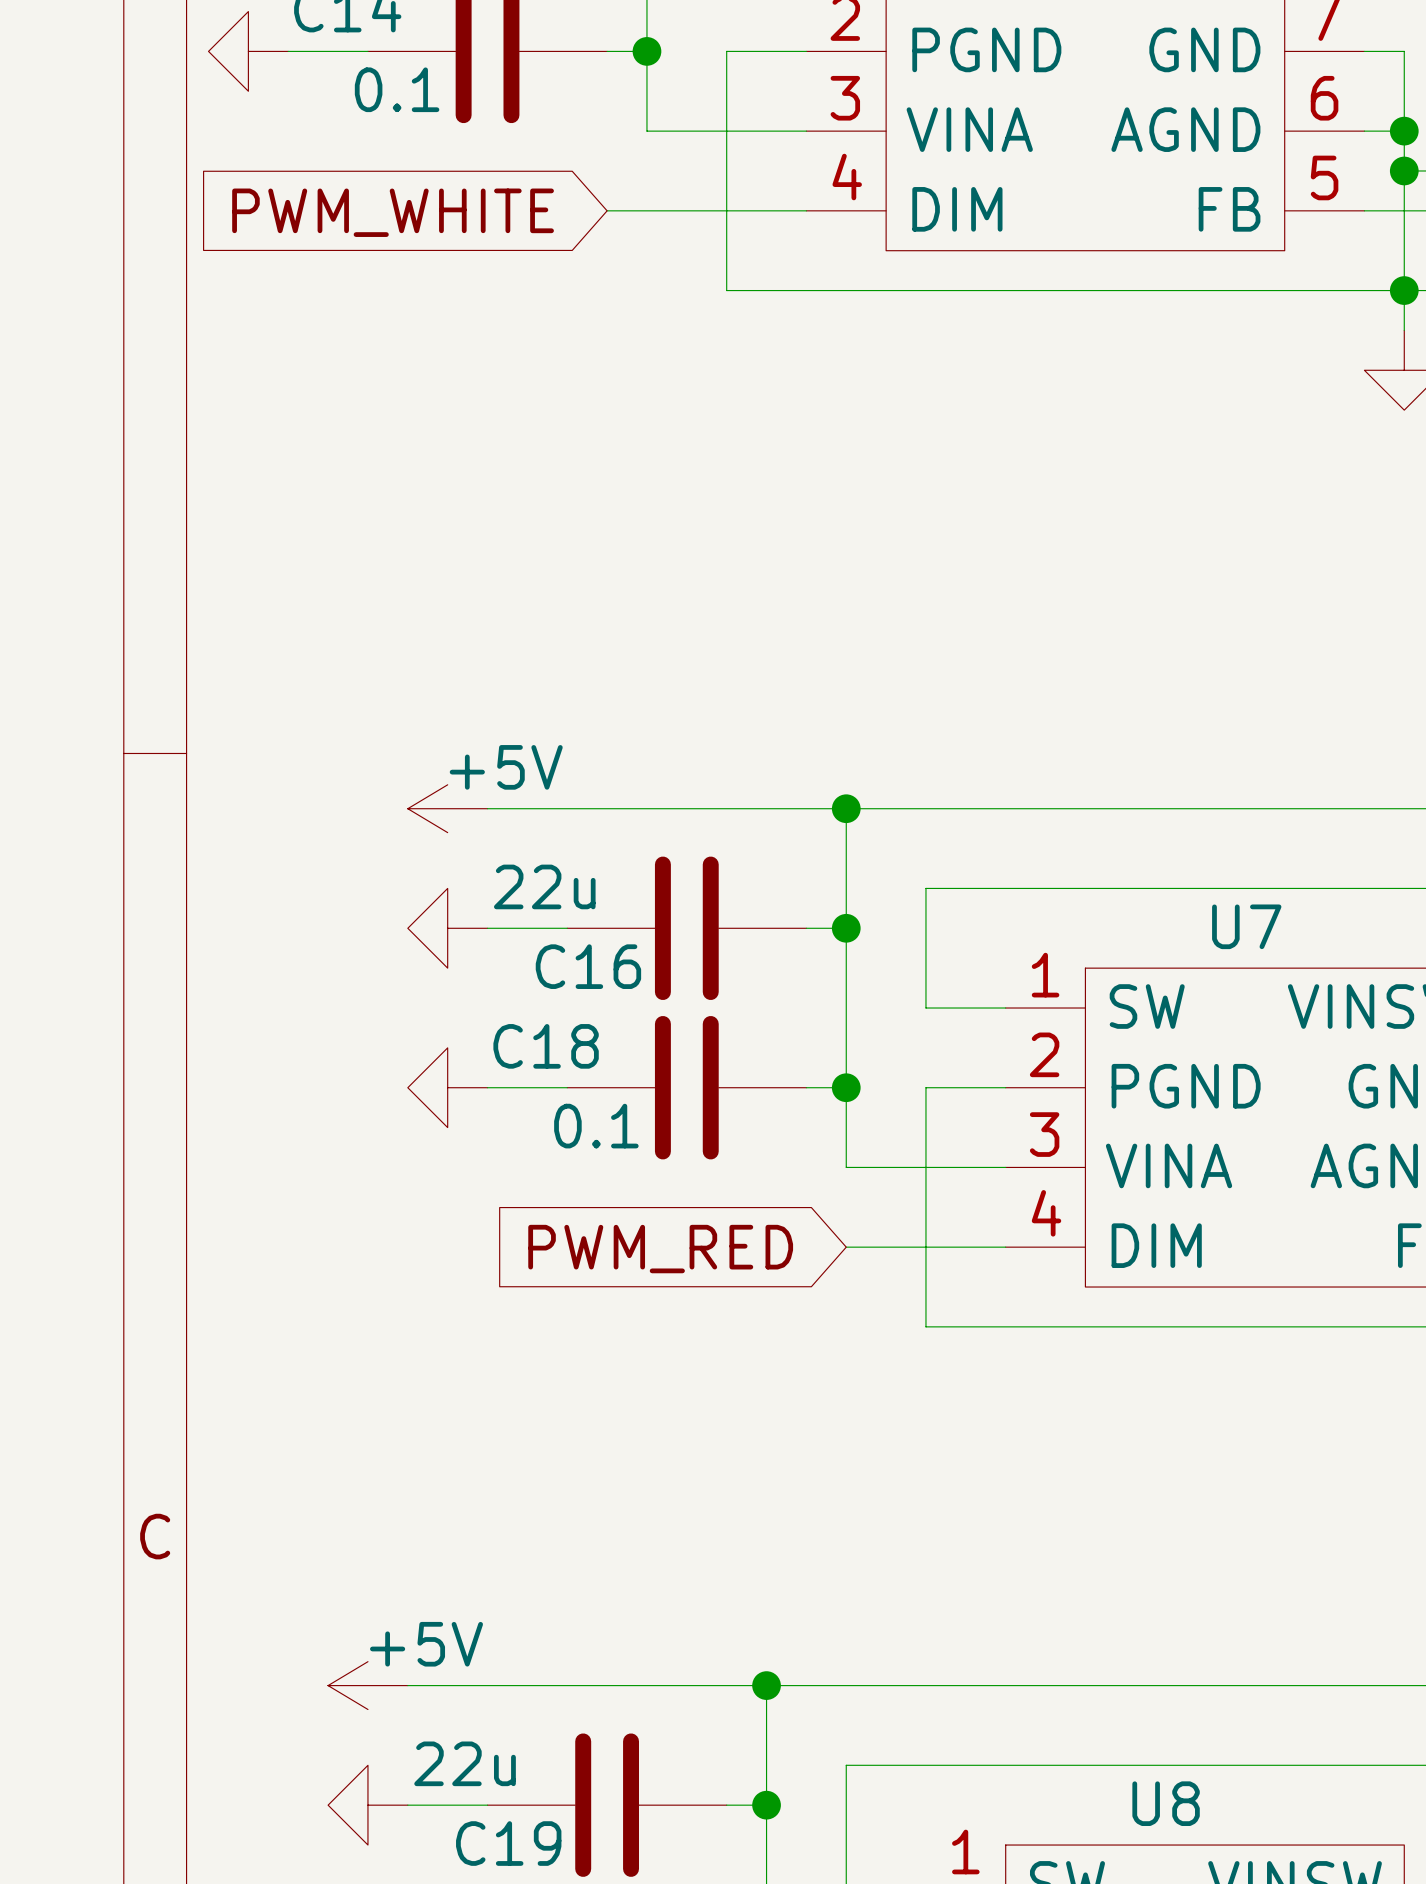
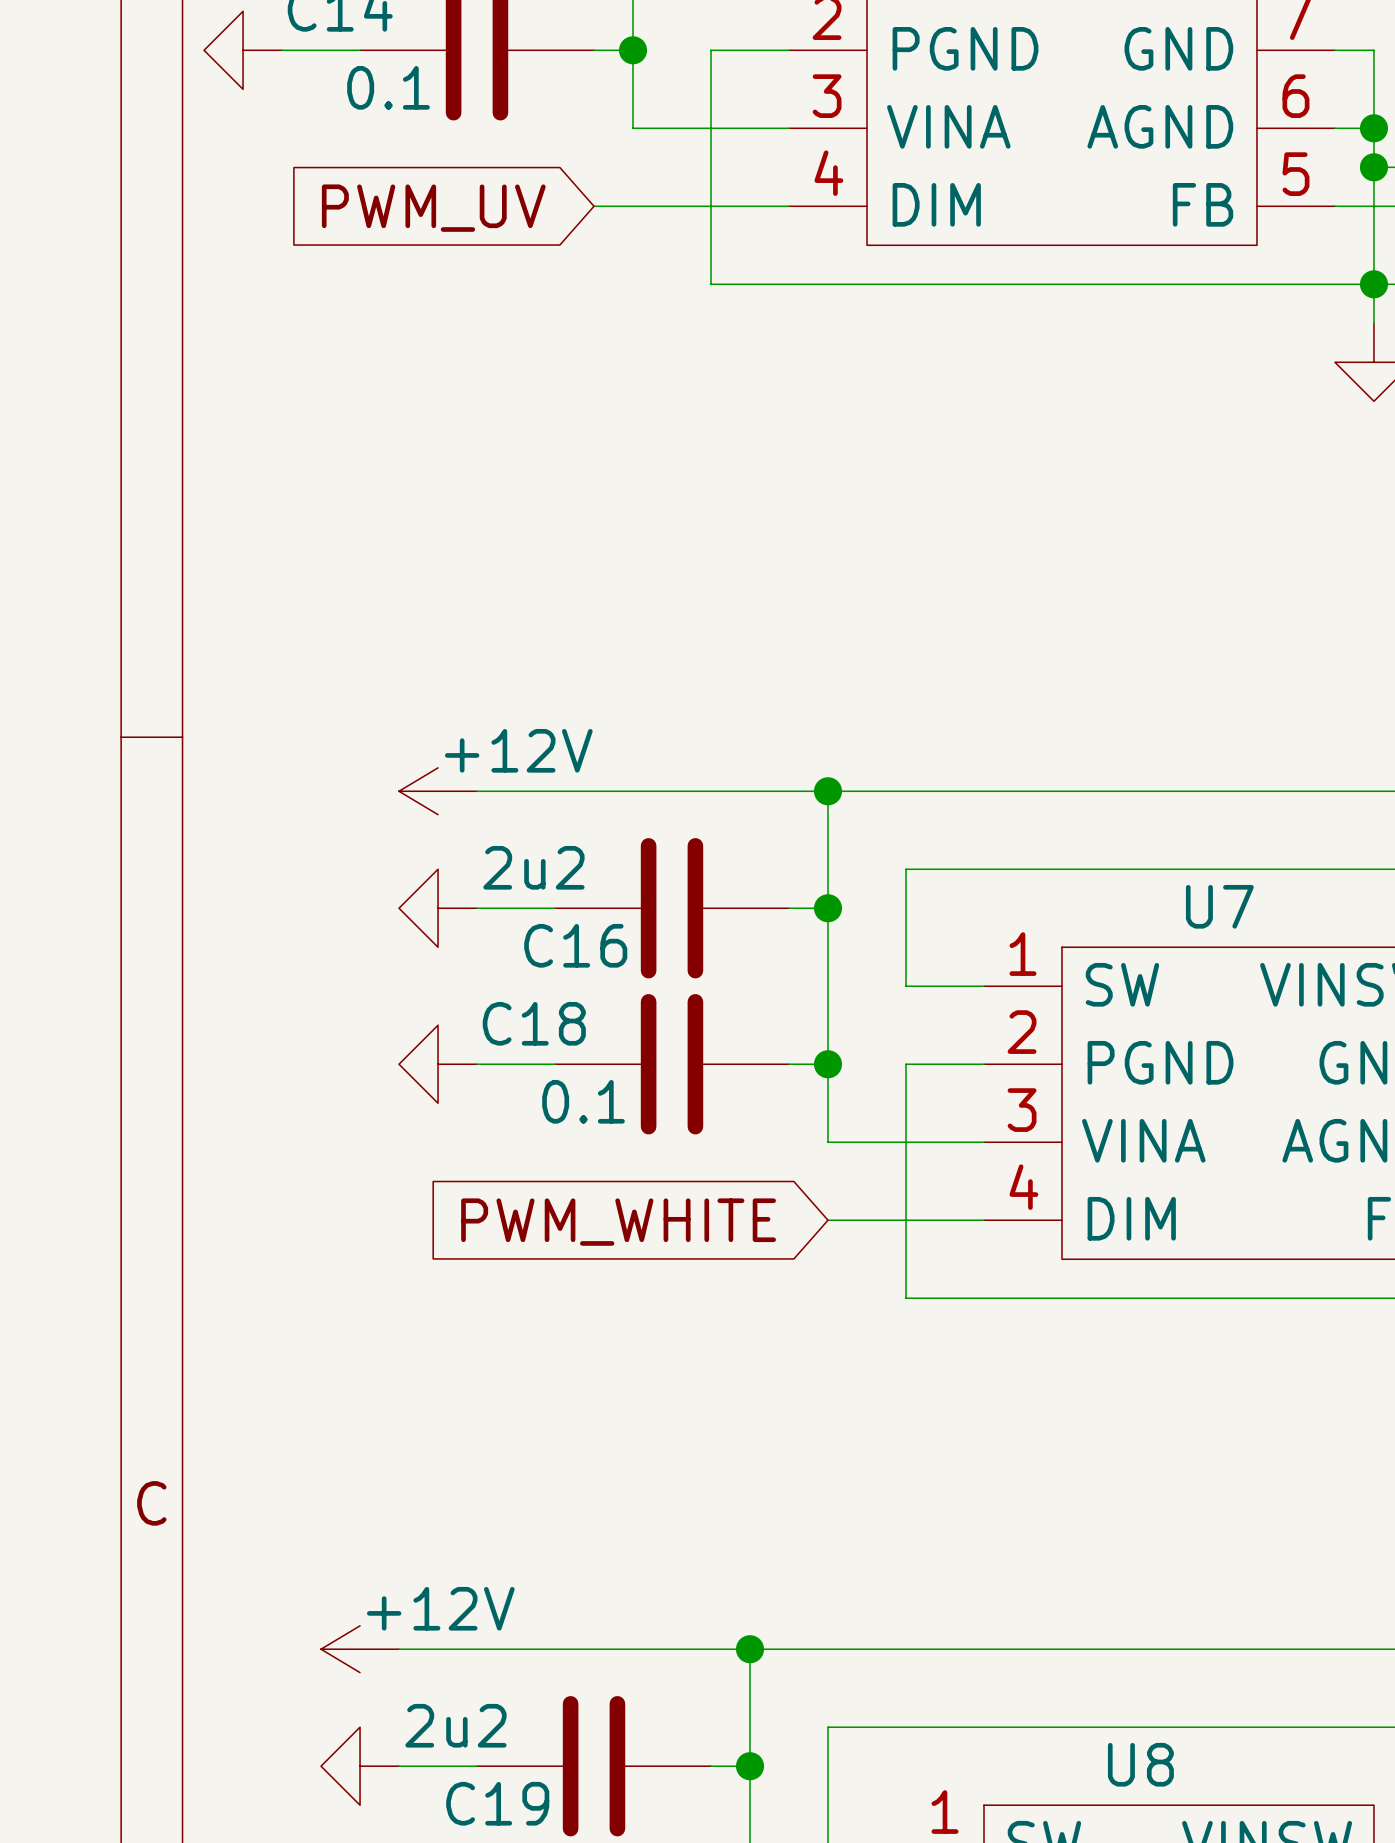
global label: PWM_WHITE (393, 212) -> PWM_UV (433, 208)
power symbol: +5V (447, 808) -> +12V (438, 791)
C16 value: 22u (544, 886) -> 2u2 (533, 867)
global label: PWM_RED (660, 1249) -> PWM_WHITE (618, 1222)
power symbol: +5V (367, 1685) -> +12V (360, 1649)
C19 value: 22u (465, 1763) -> 2u2 (455, 1725)

